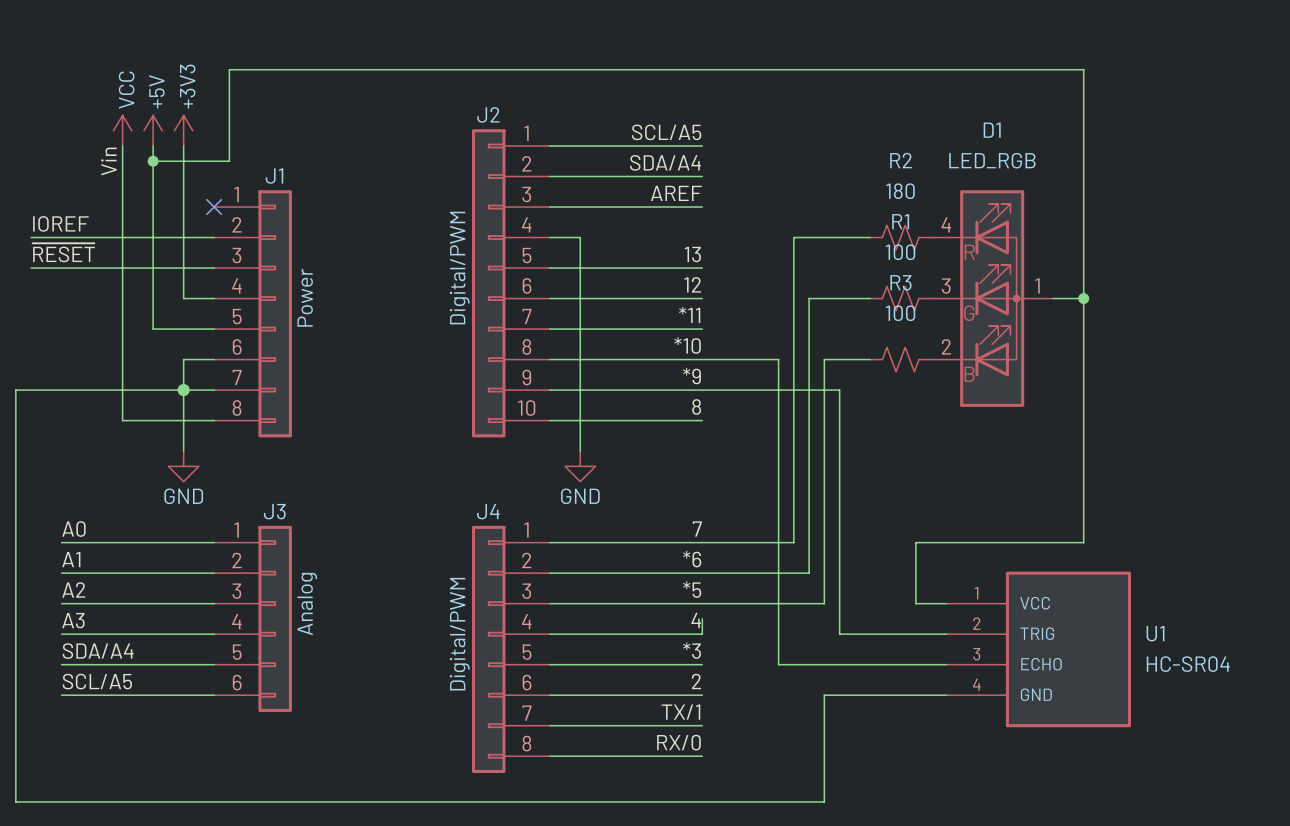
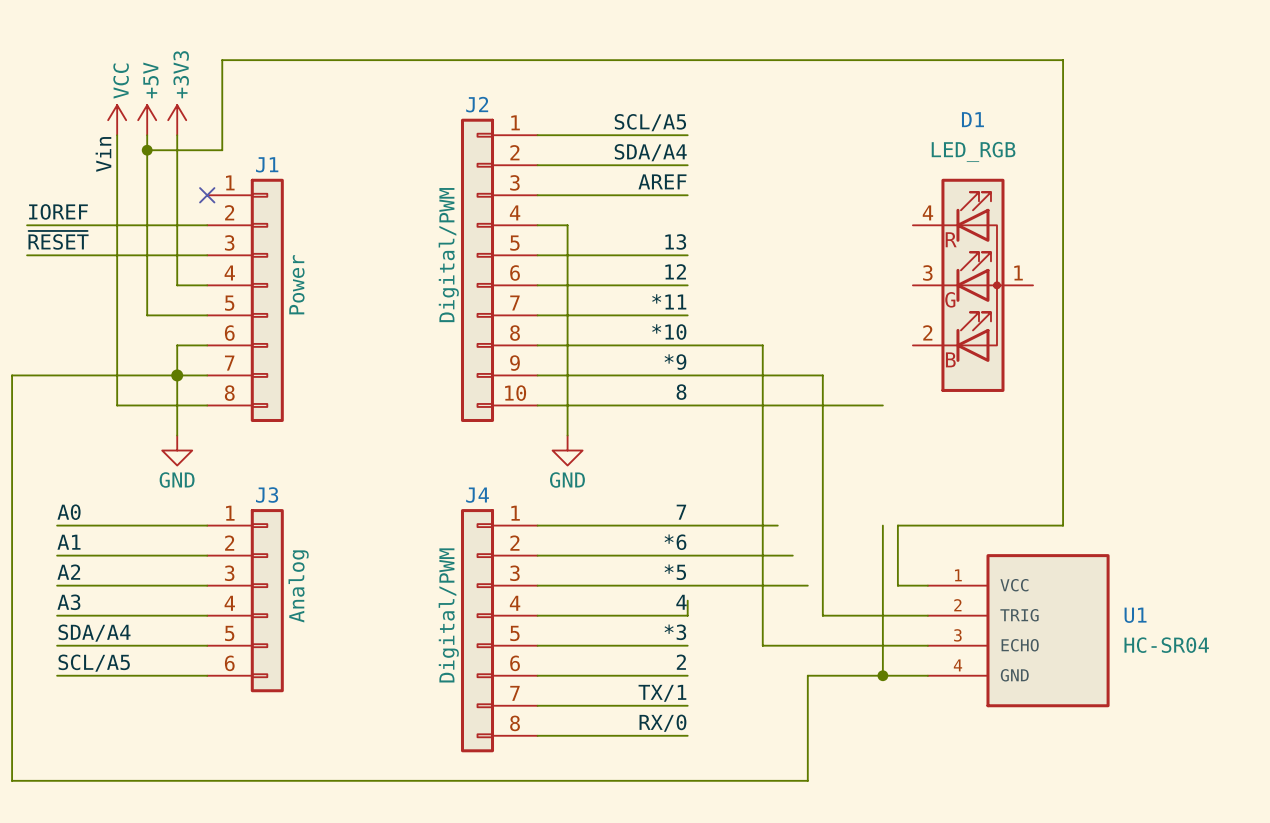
wire: (870, 237) (793, 237) (793, 542) -> none
R2: 180 (900, 237) -> none
wire: (870, 298) (809, 298) (809, 573) -> none
R1: 100 (900, 298) -> none
wire: (1053, 298) (1083, 298) -> none
junction: (1083, 298) -> none
wire: (870, 359) (824, 359) (824, 603) -> none
R3: 100 (900, 359) -> none
wire: none -> (687, 405) (882, 405)
wire: none -> (882, 525) (882, 675)
junction: none -> (882, 675)

